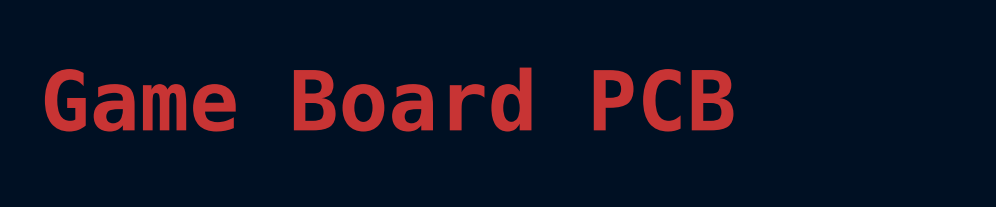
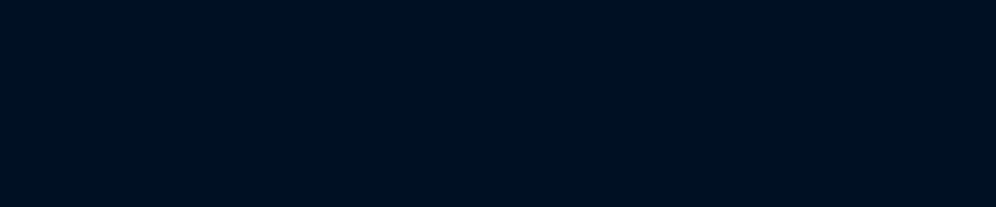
text: Game Board PCB (389, 99) -> none

